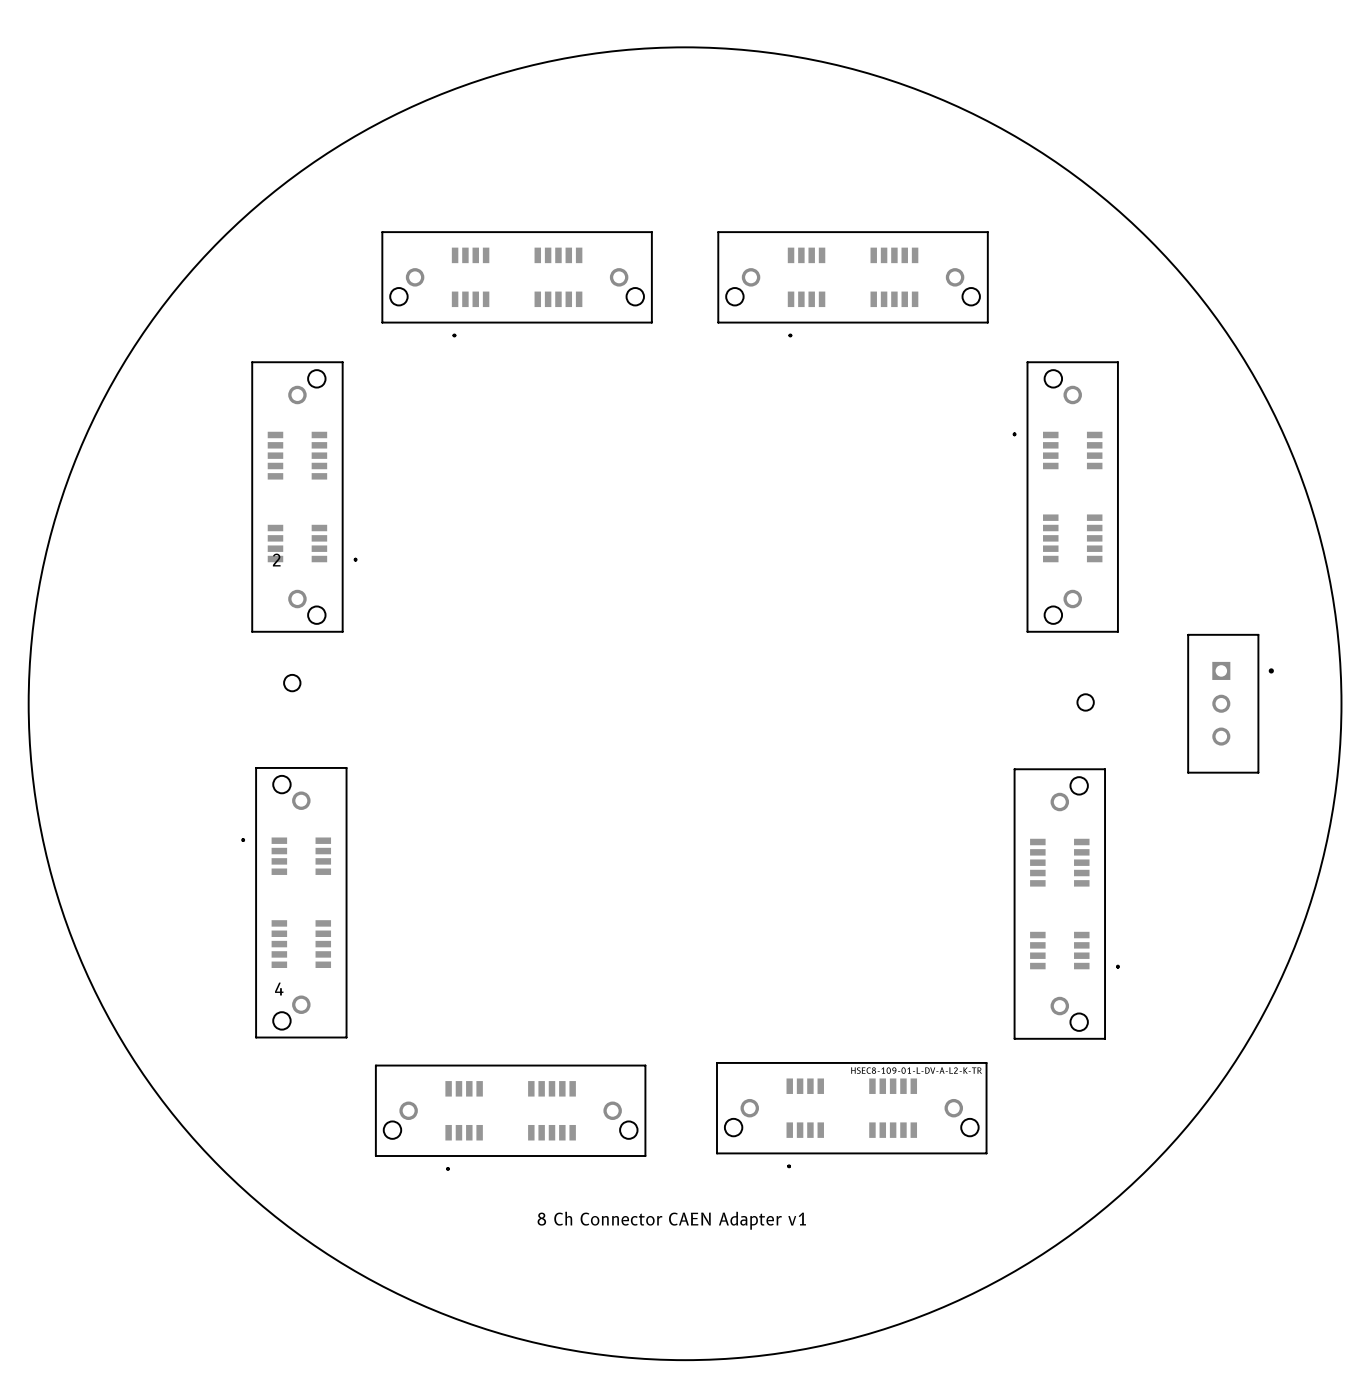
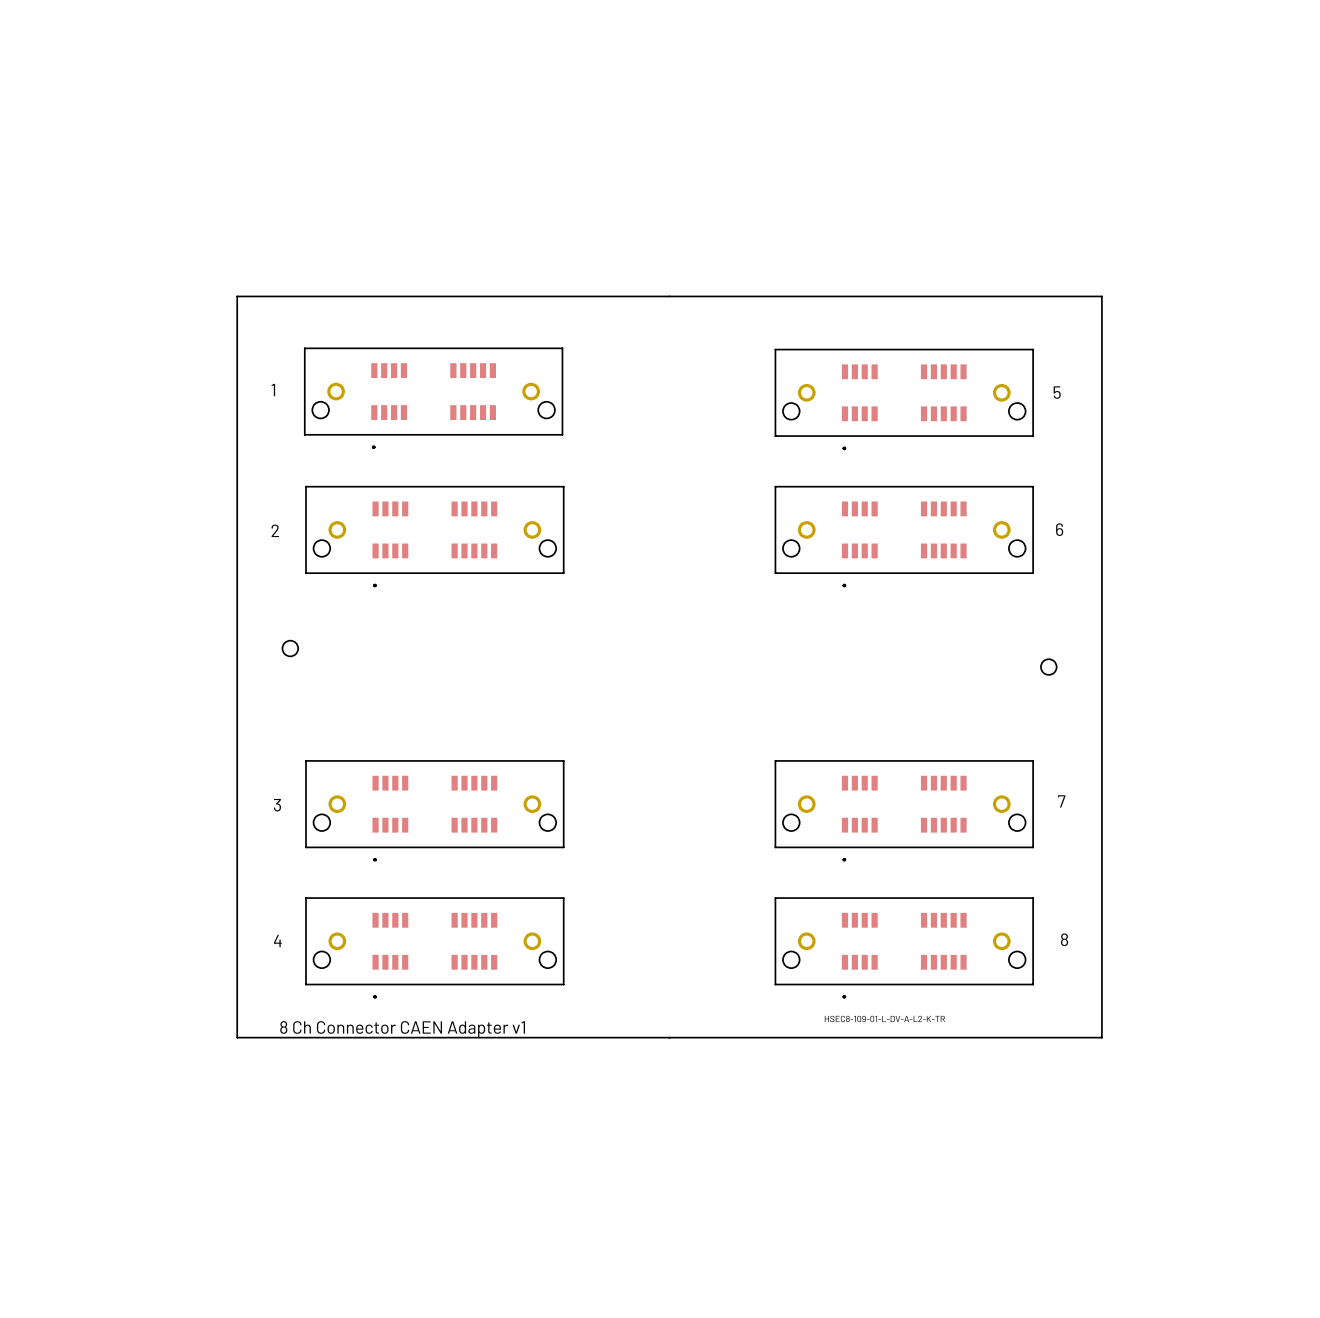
round board edge: [28, 47, 1342, 1361] -> none
part: (517, 284) -> none
part: (853, 284) -> none
board edge: none -> (237, 296) (1101, 296) (1101, 1037) (237, 1037) (237, 296)
text: none -> 1 (273, 390)
text: none -> 5 (1057, 392)
part: none -> (433, 398)
part: none -> (904, 399)
part: (304, 497) -> none
part: (1065, 497) -> none
text: none -> 6 (1059, 529)
part: none -> (434, 536)
part: none -> (904, 536)
part: (1230, 703) -> none
text: none -> 7 (1061, 801)
text: none -> 3 (277, 805)
part: none -> (434, 810)
part: none -> (904, 810)
part: (294, 902) -> none
part: (1066, 904) -> none
text: none -> 8 (1064, 939)
part: none -> (434, 948)
part: none -> (904, 948)
part: (851, 1115) -> none
part: (510, 1117) -> none
text position: 8 Ch Connector CAEN Adapter v1 (671, 1220) -> 8 Ch Connector CAEN Adapter v1 (402, 1029)

